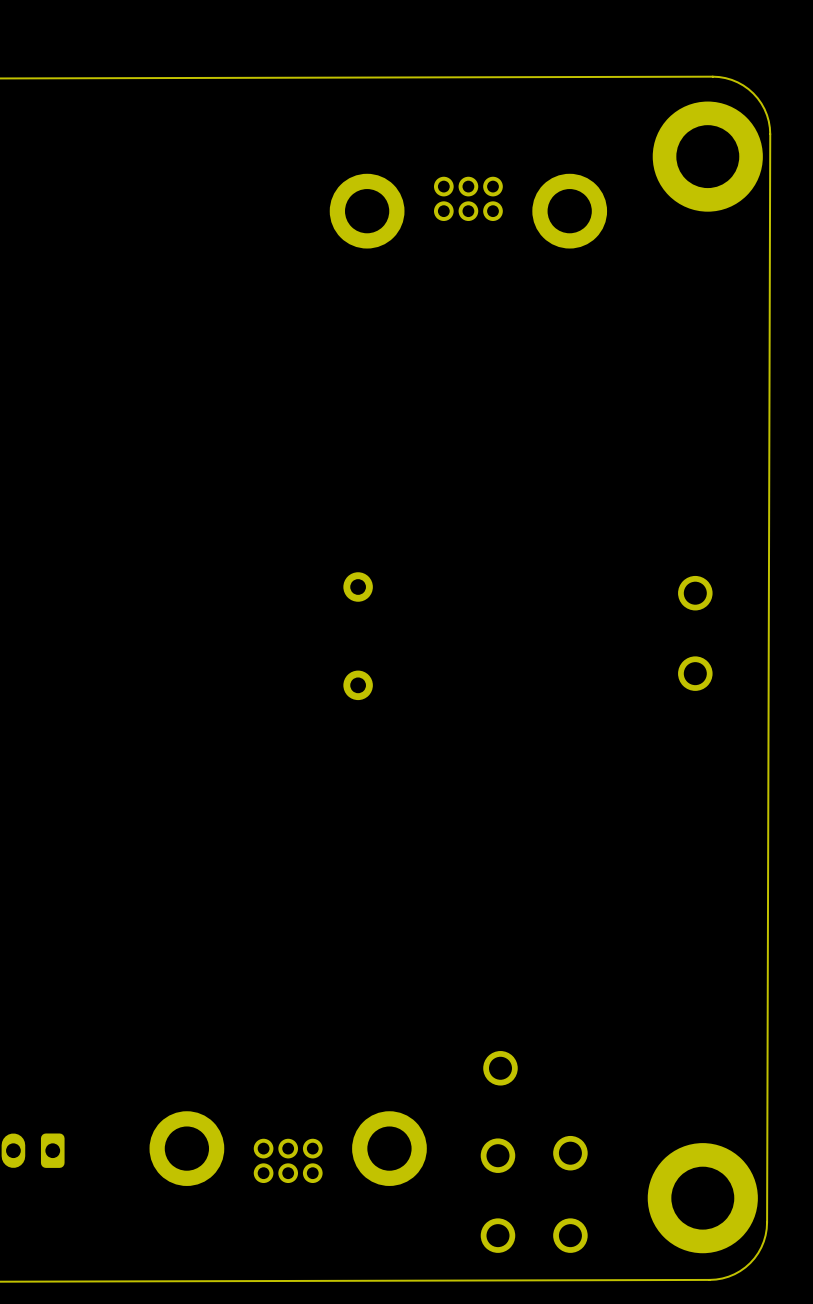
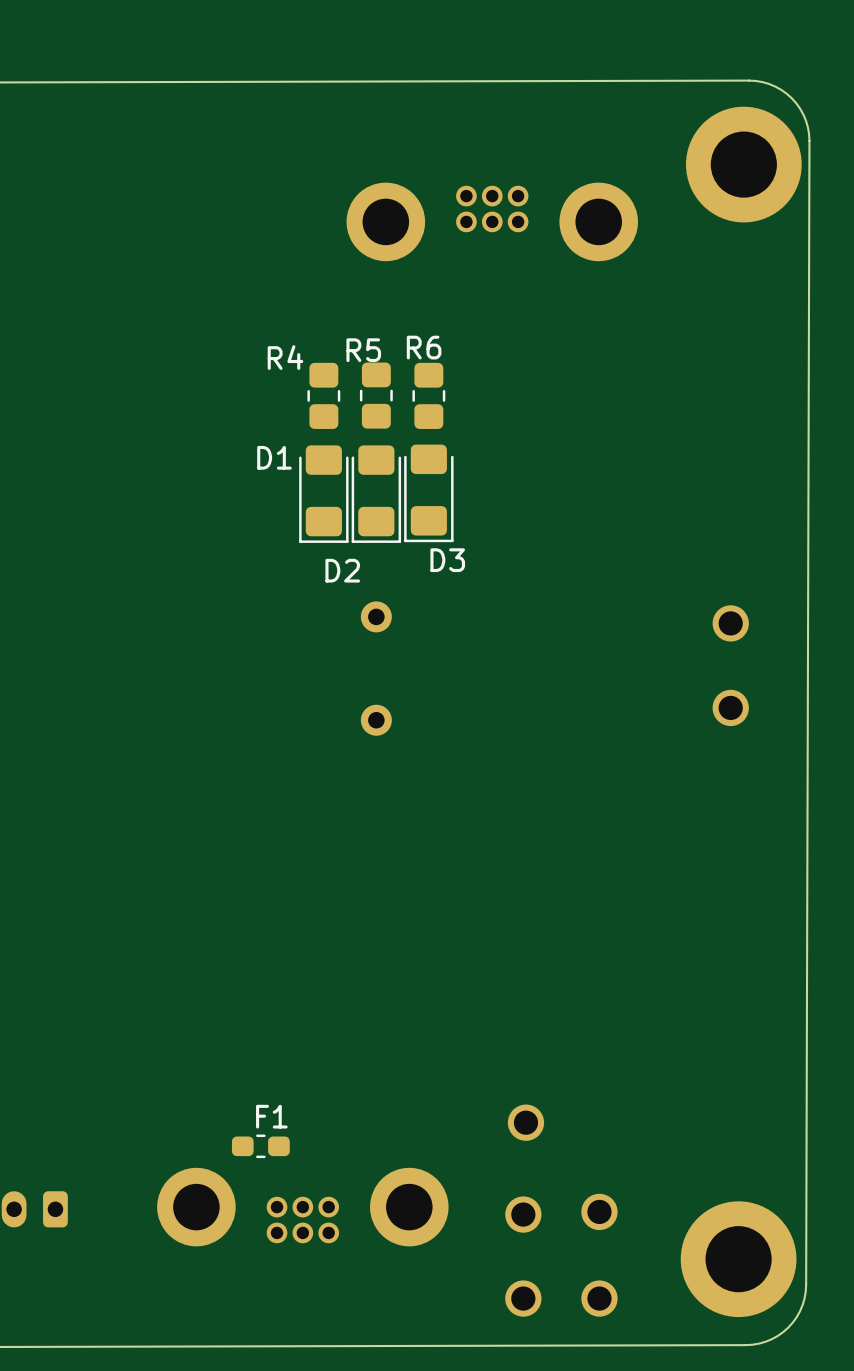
R4: none -> (323, 395)
R5: none -> (376, 395)
R6: none -> (428, 395)
D3: none -> (428, 493)
D1: none -> (323, 494)
D2: none -> (376, 494)
F1: none -> (260, 1146)

